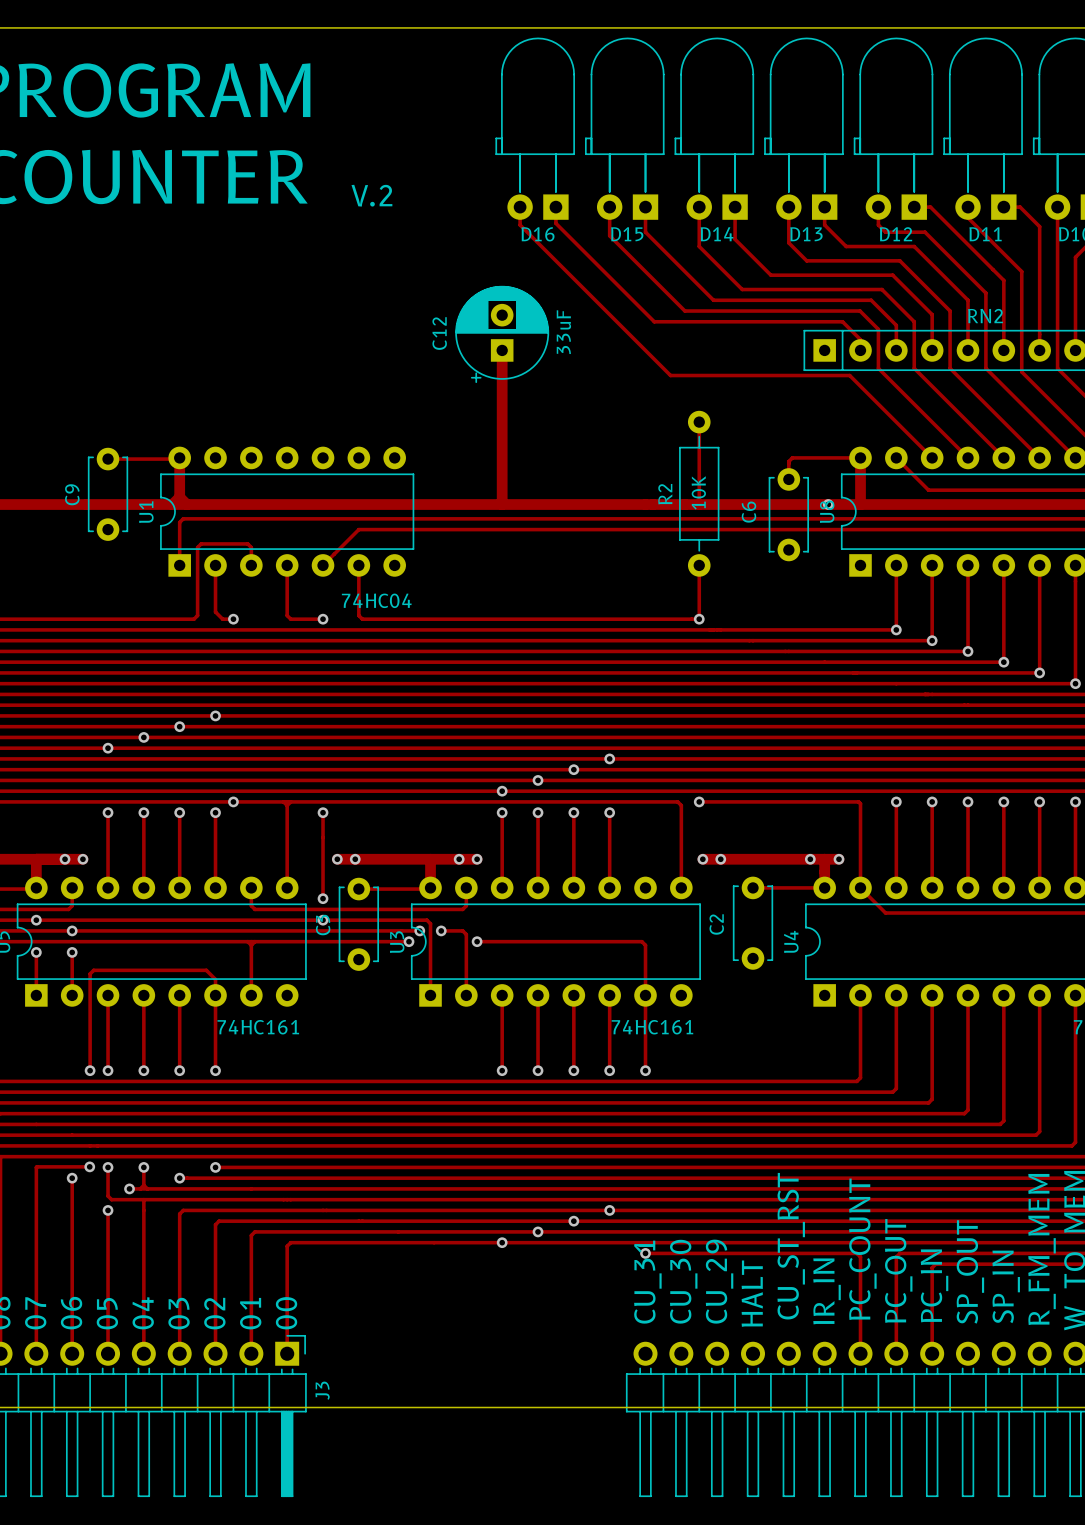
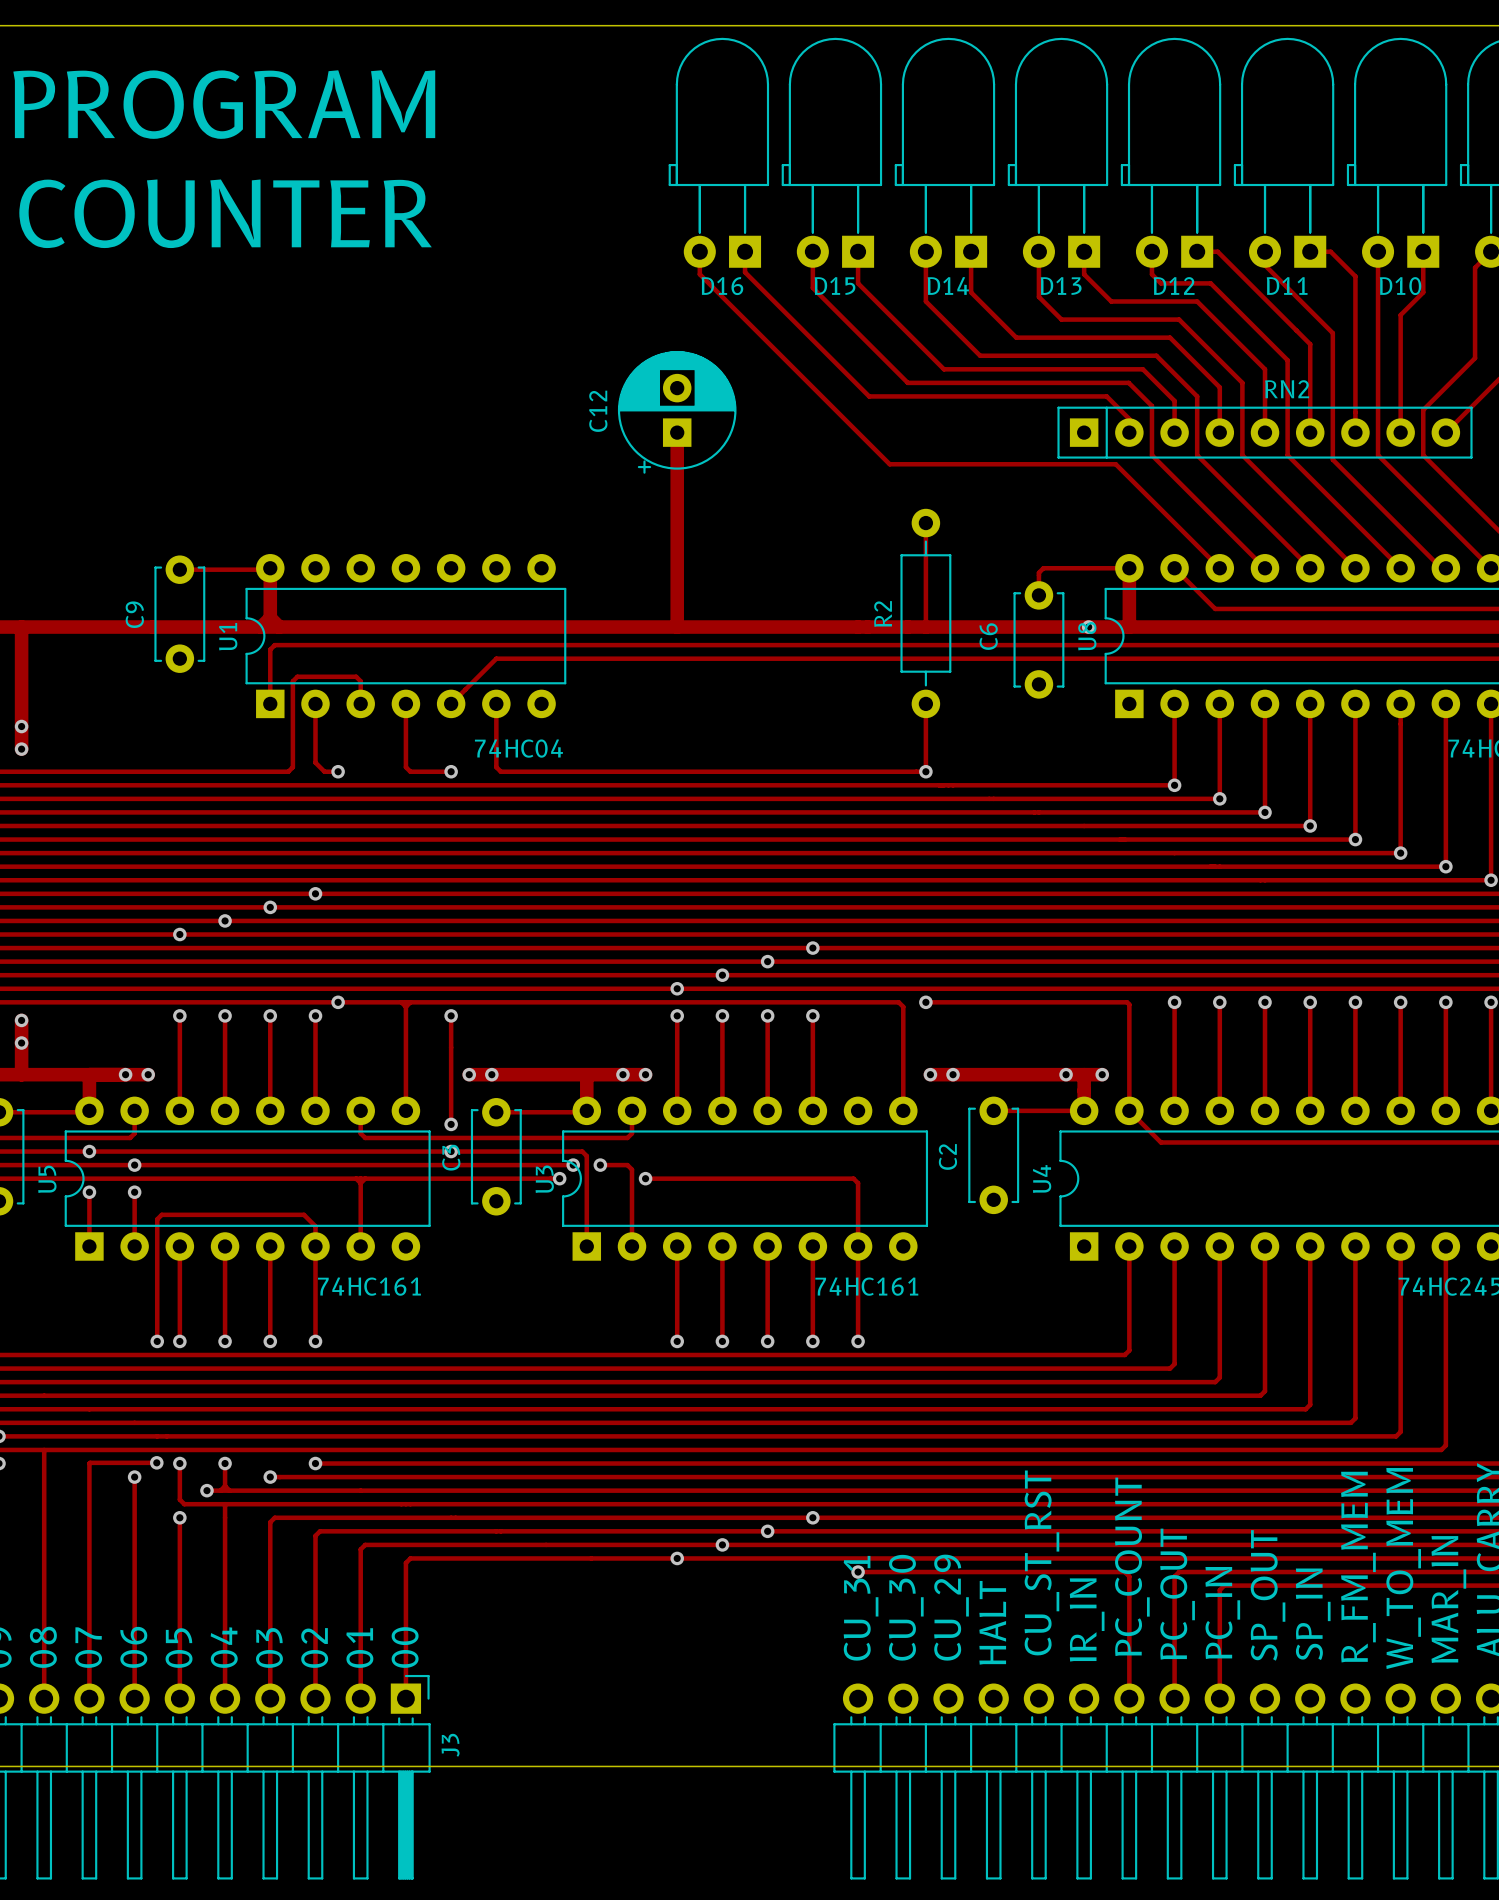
text: V.2 (371, 195) -> none
C12 value: 33uF (563, 332) -> none
R2 value: 10K (698, 492) -> none

